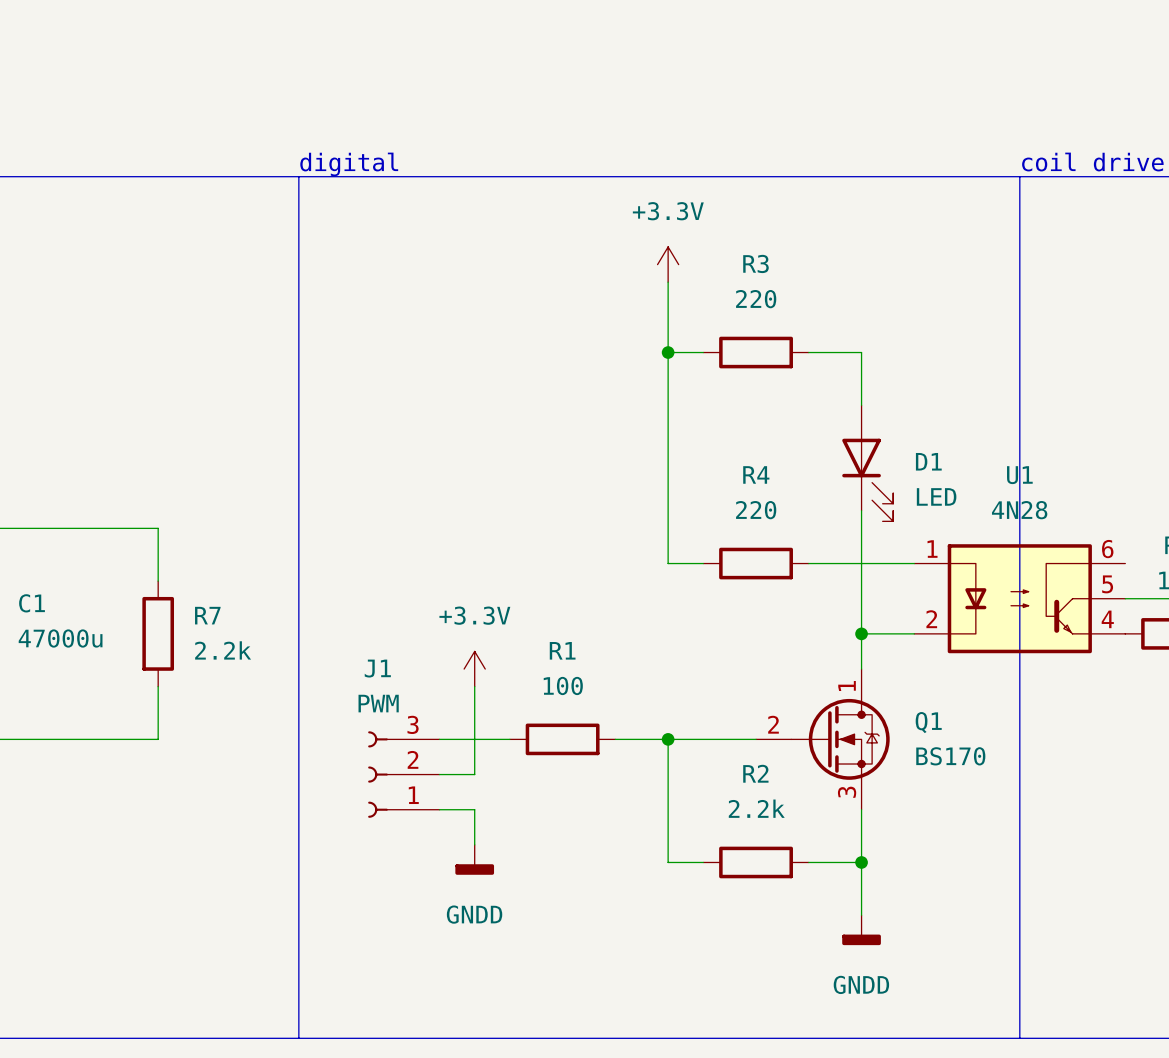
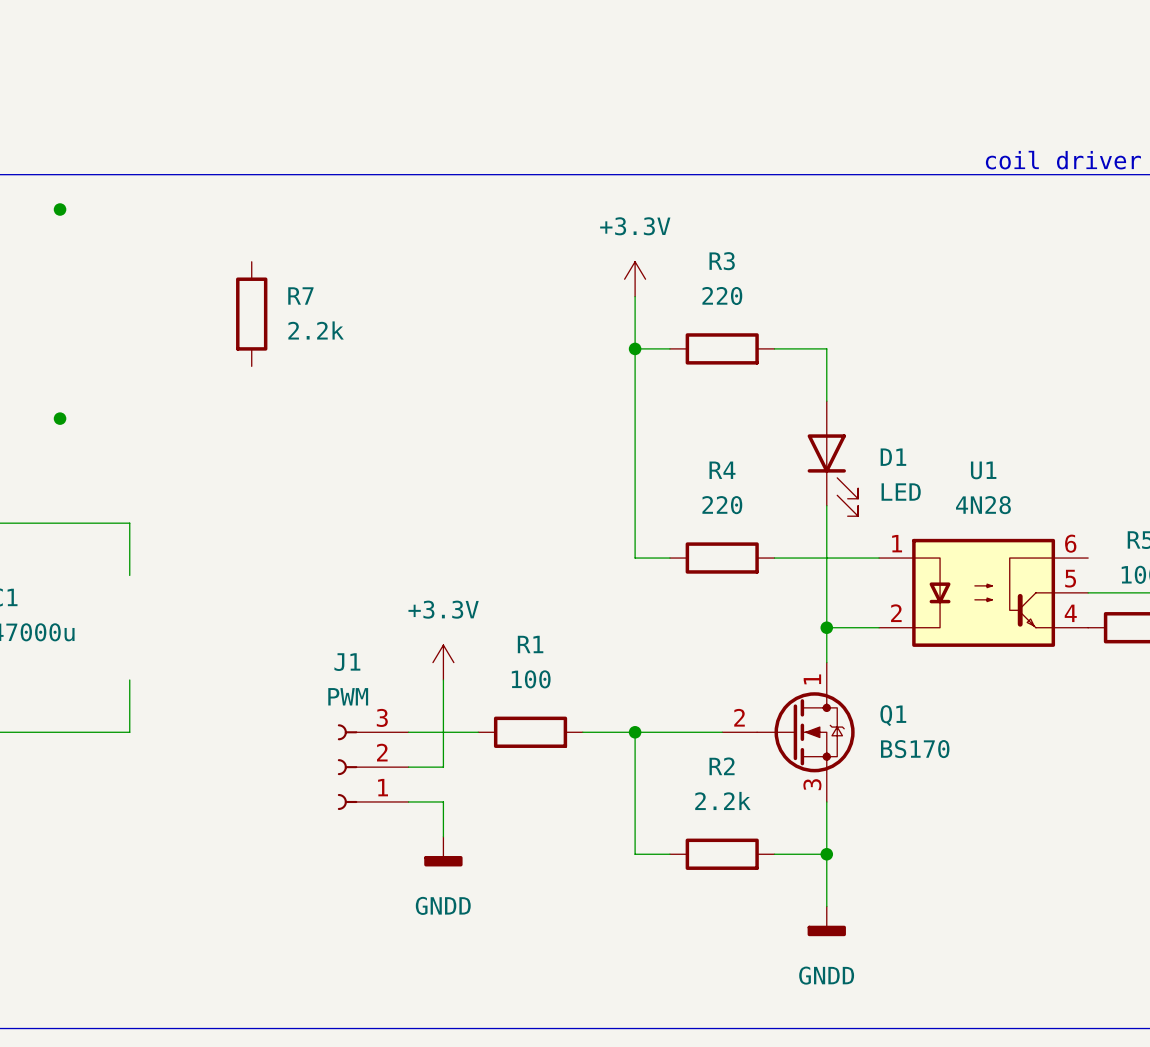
text: digital (349, 164) -> none
line: (298, 176) (298, 1038) -> none
line: (1019, 176) (1019, 1038) -> none
junction: none -> (60, 209)
power symbol position: +3.3V (668, 264) -> +3.3V (635, 279)
junction: none -> (60, 418)
R7 position: (158, 633) -> (251, 314)

